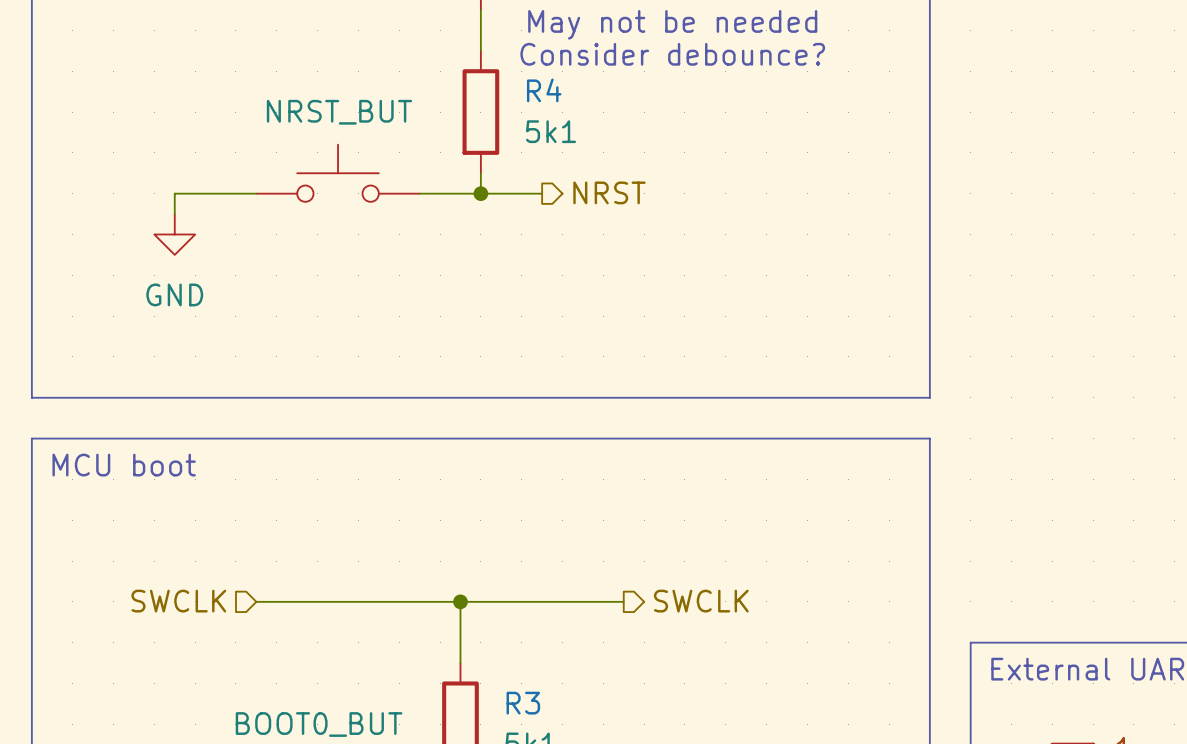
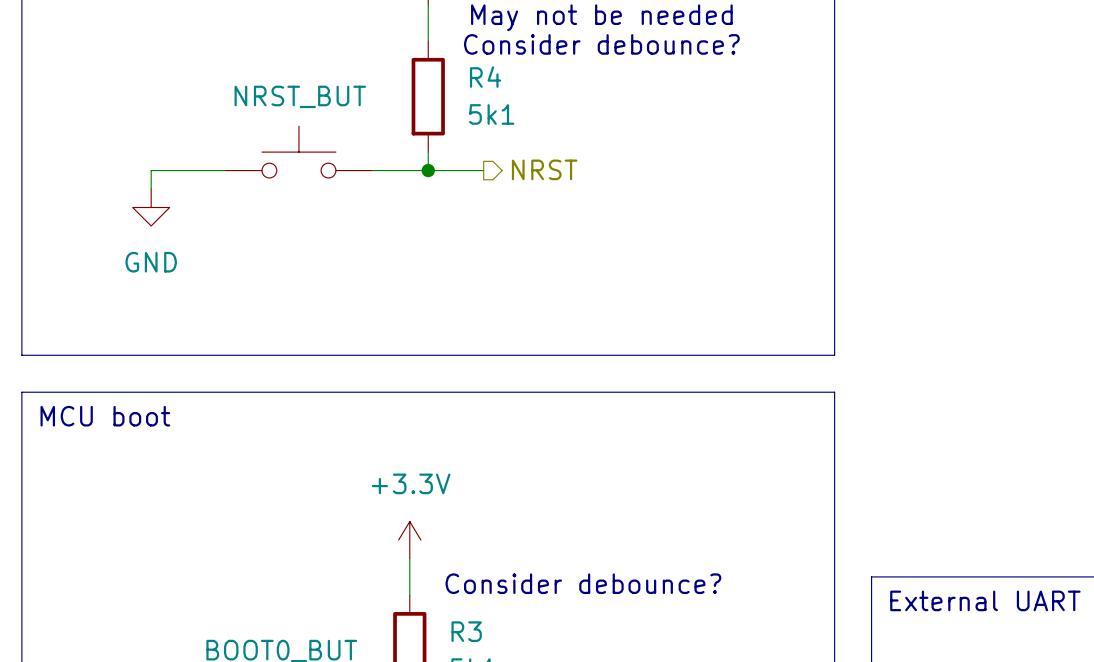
hierarchical label: SWCLK (178, 601) -> none
wire: (256, 601) (623, 601) -> none
junction: (460, 601) -> none
power symbol: none -> +3.3V (409, 539)
hierarchical label: SWCLK (701, 601) -> none
text: none -> Consider debounce? (583, 583)

